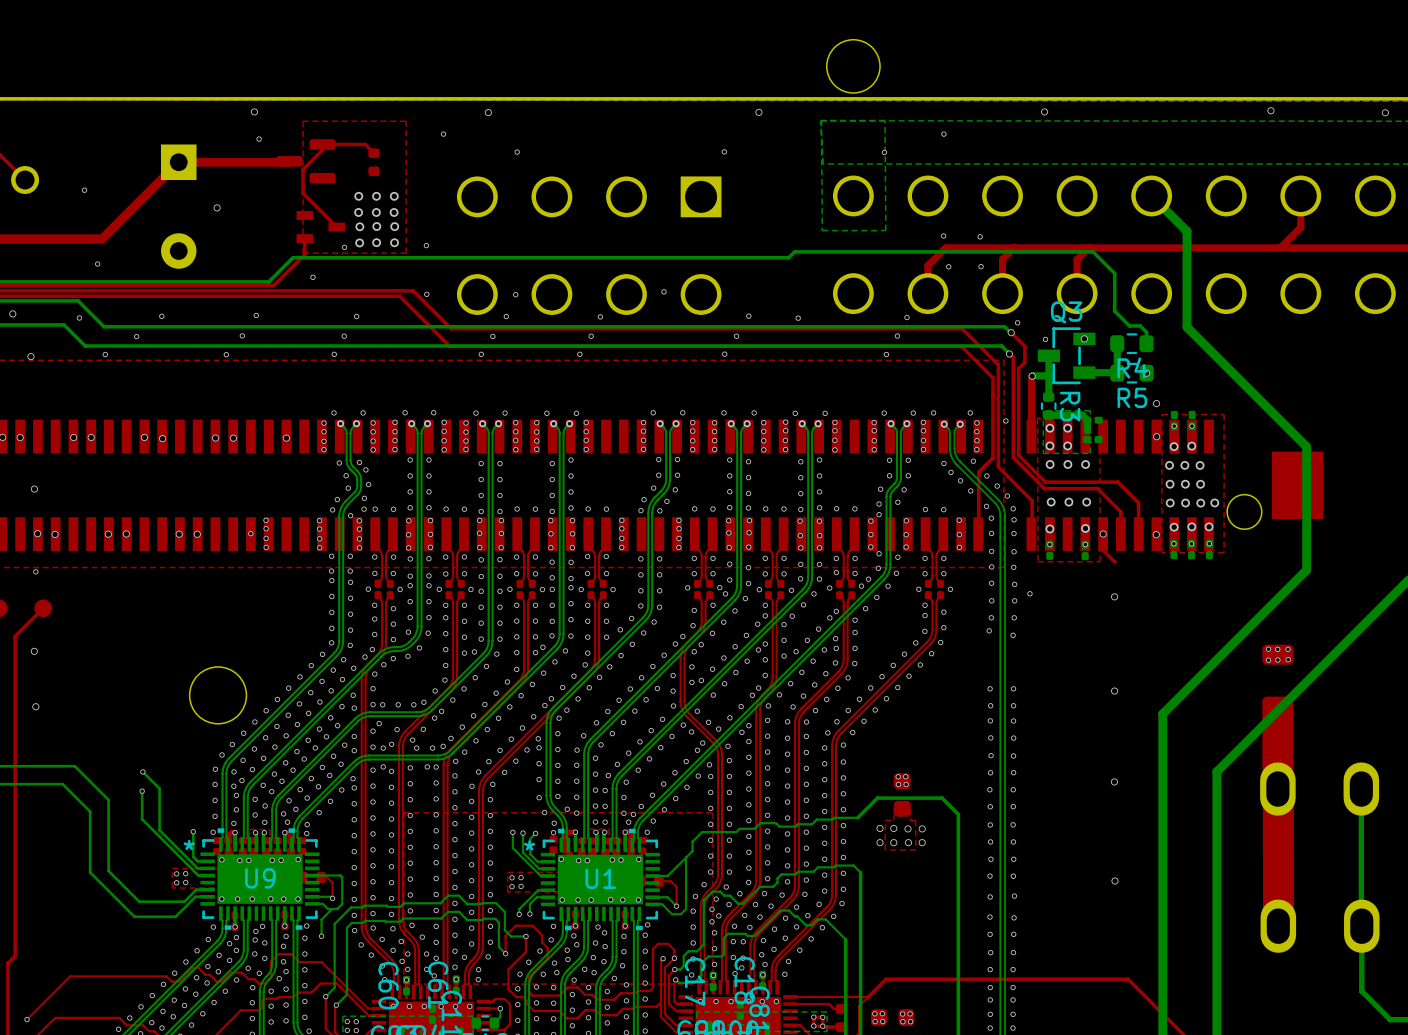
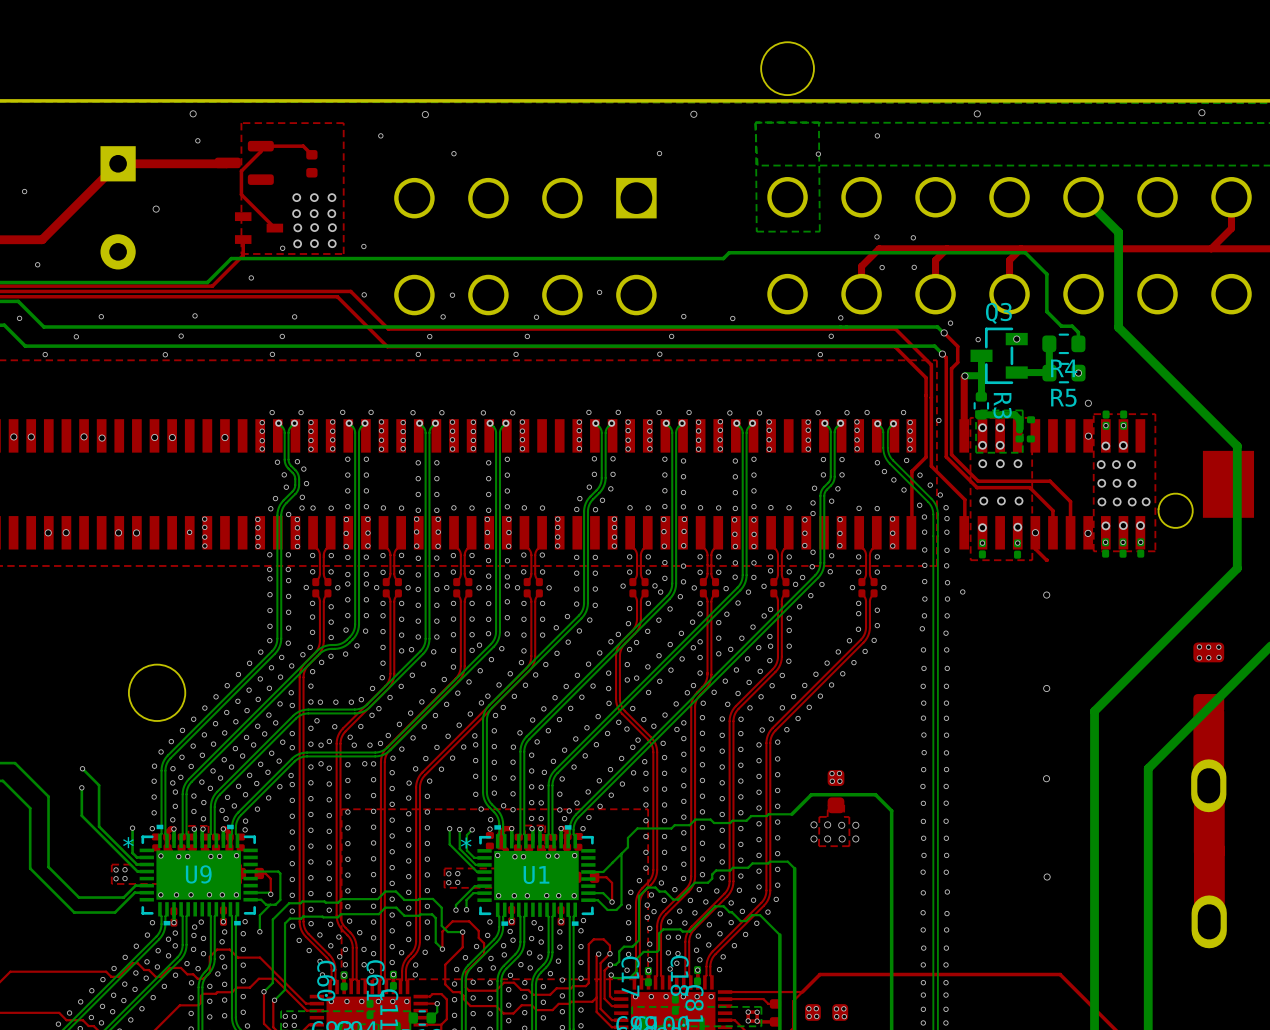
via: none -> (923, 649)
via: none -> (946, 649)
via: none -> (923, 668)
via: none -> (947, 668)

